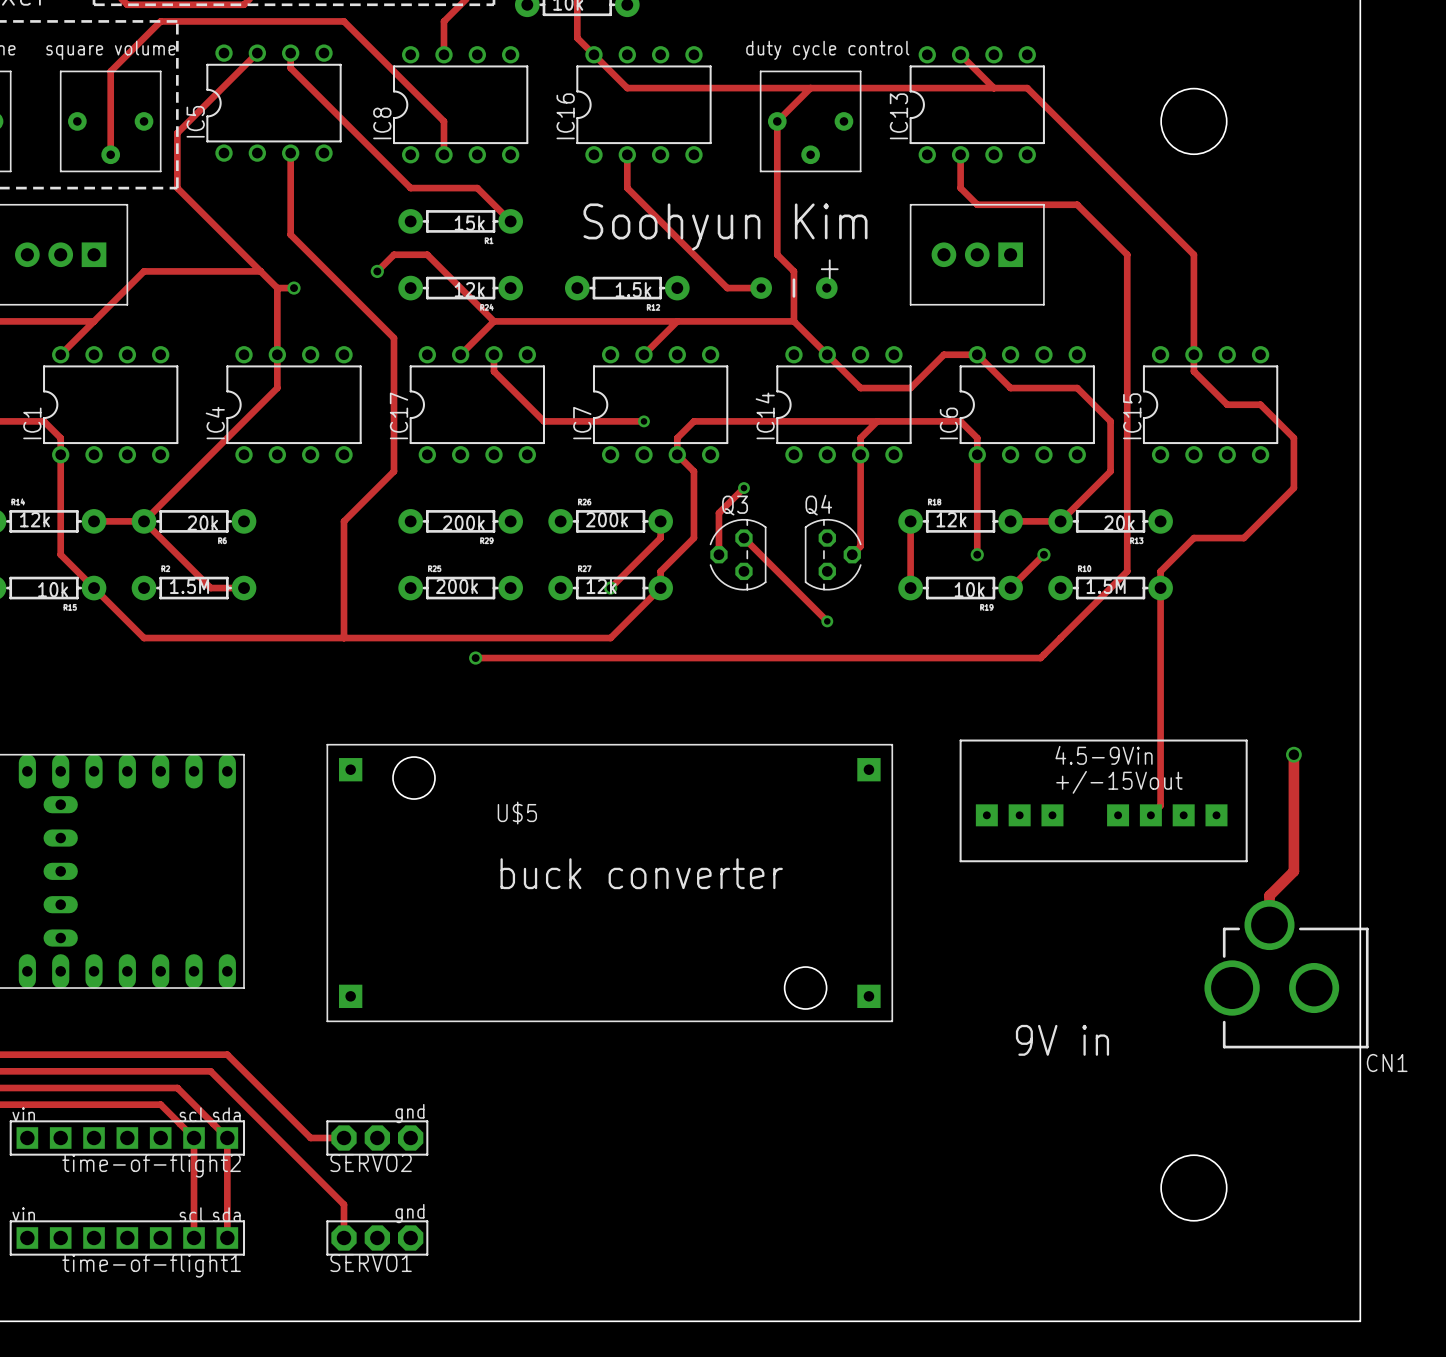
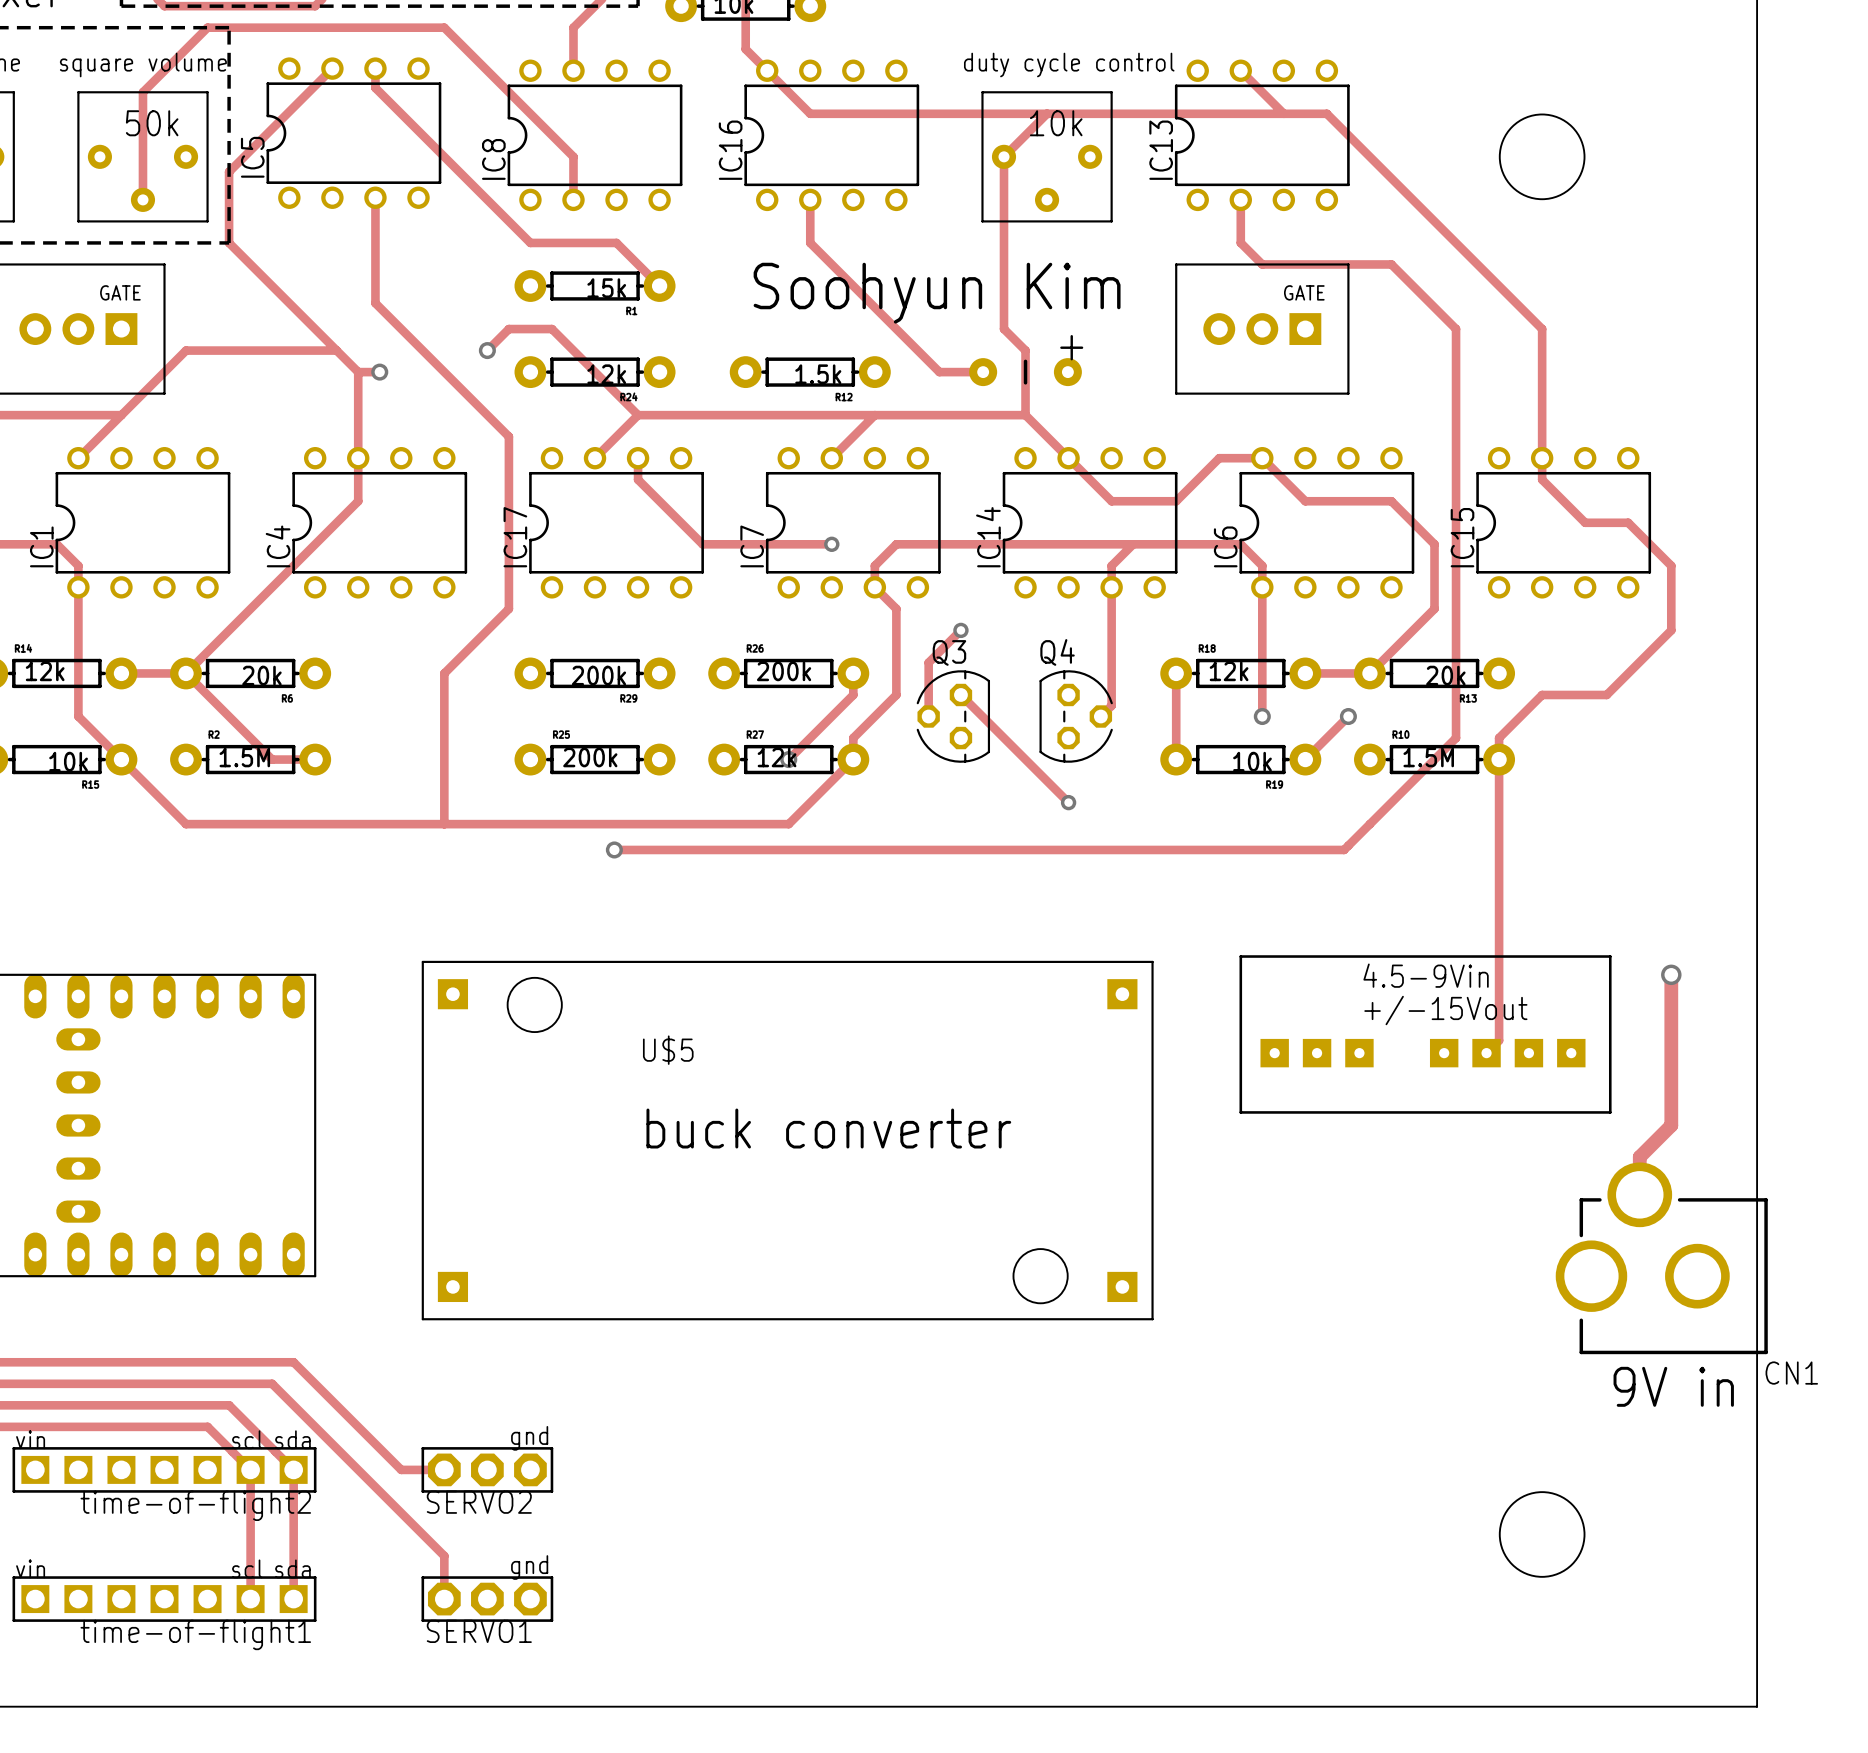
text: none -> 50k (152, 123)
text: none -> 10k (1056, 123)
text: none -> GATE (120, 292)
text: none -> GATE (1304, 292)
text position: 9V in (1062, 1040) -> 9V in (1673, 1386)

